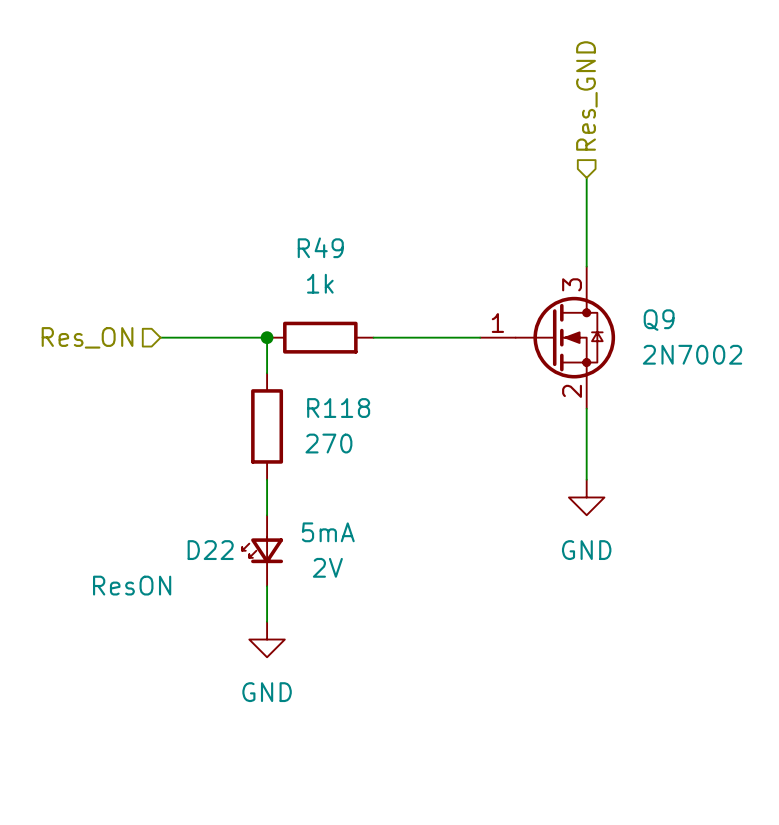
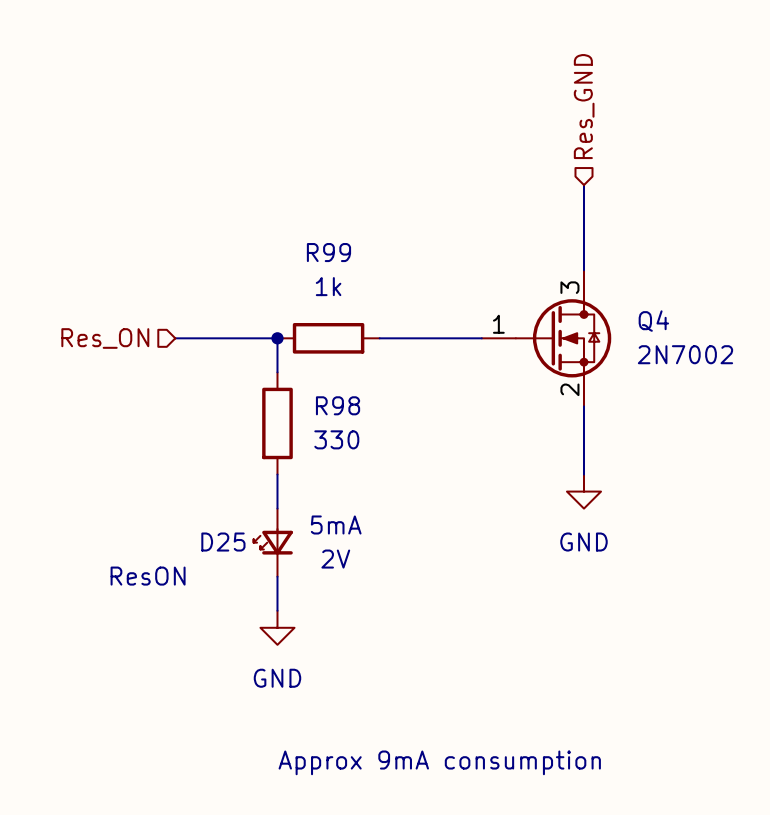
R49 name: R49 (320, 247) -> R99 (328, 252)
Q9 name: Q9 (659, 320) -> Q4 (653, 321)
R118 name: R118 (338, 408) -> R98 (338, 405)
R118 value: 270 (328, 443) -> 330 (336, 439)
D22 name: D22 (210, 550) -> D25 (223, 542)
text: none -> Approx 9mA consumption (439, 762)

